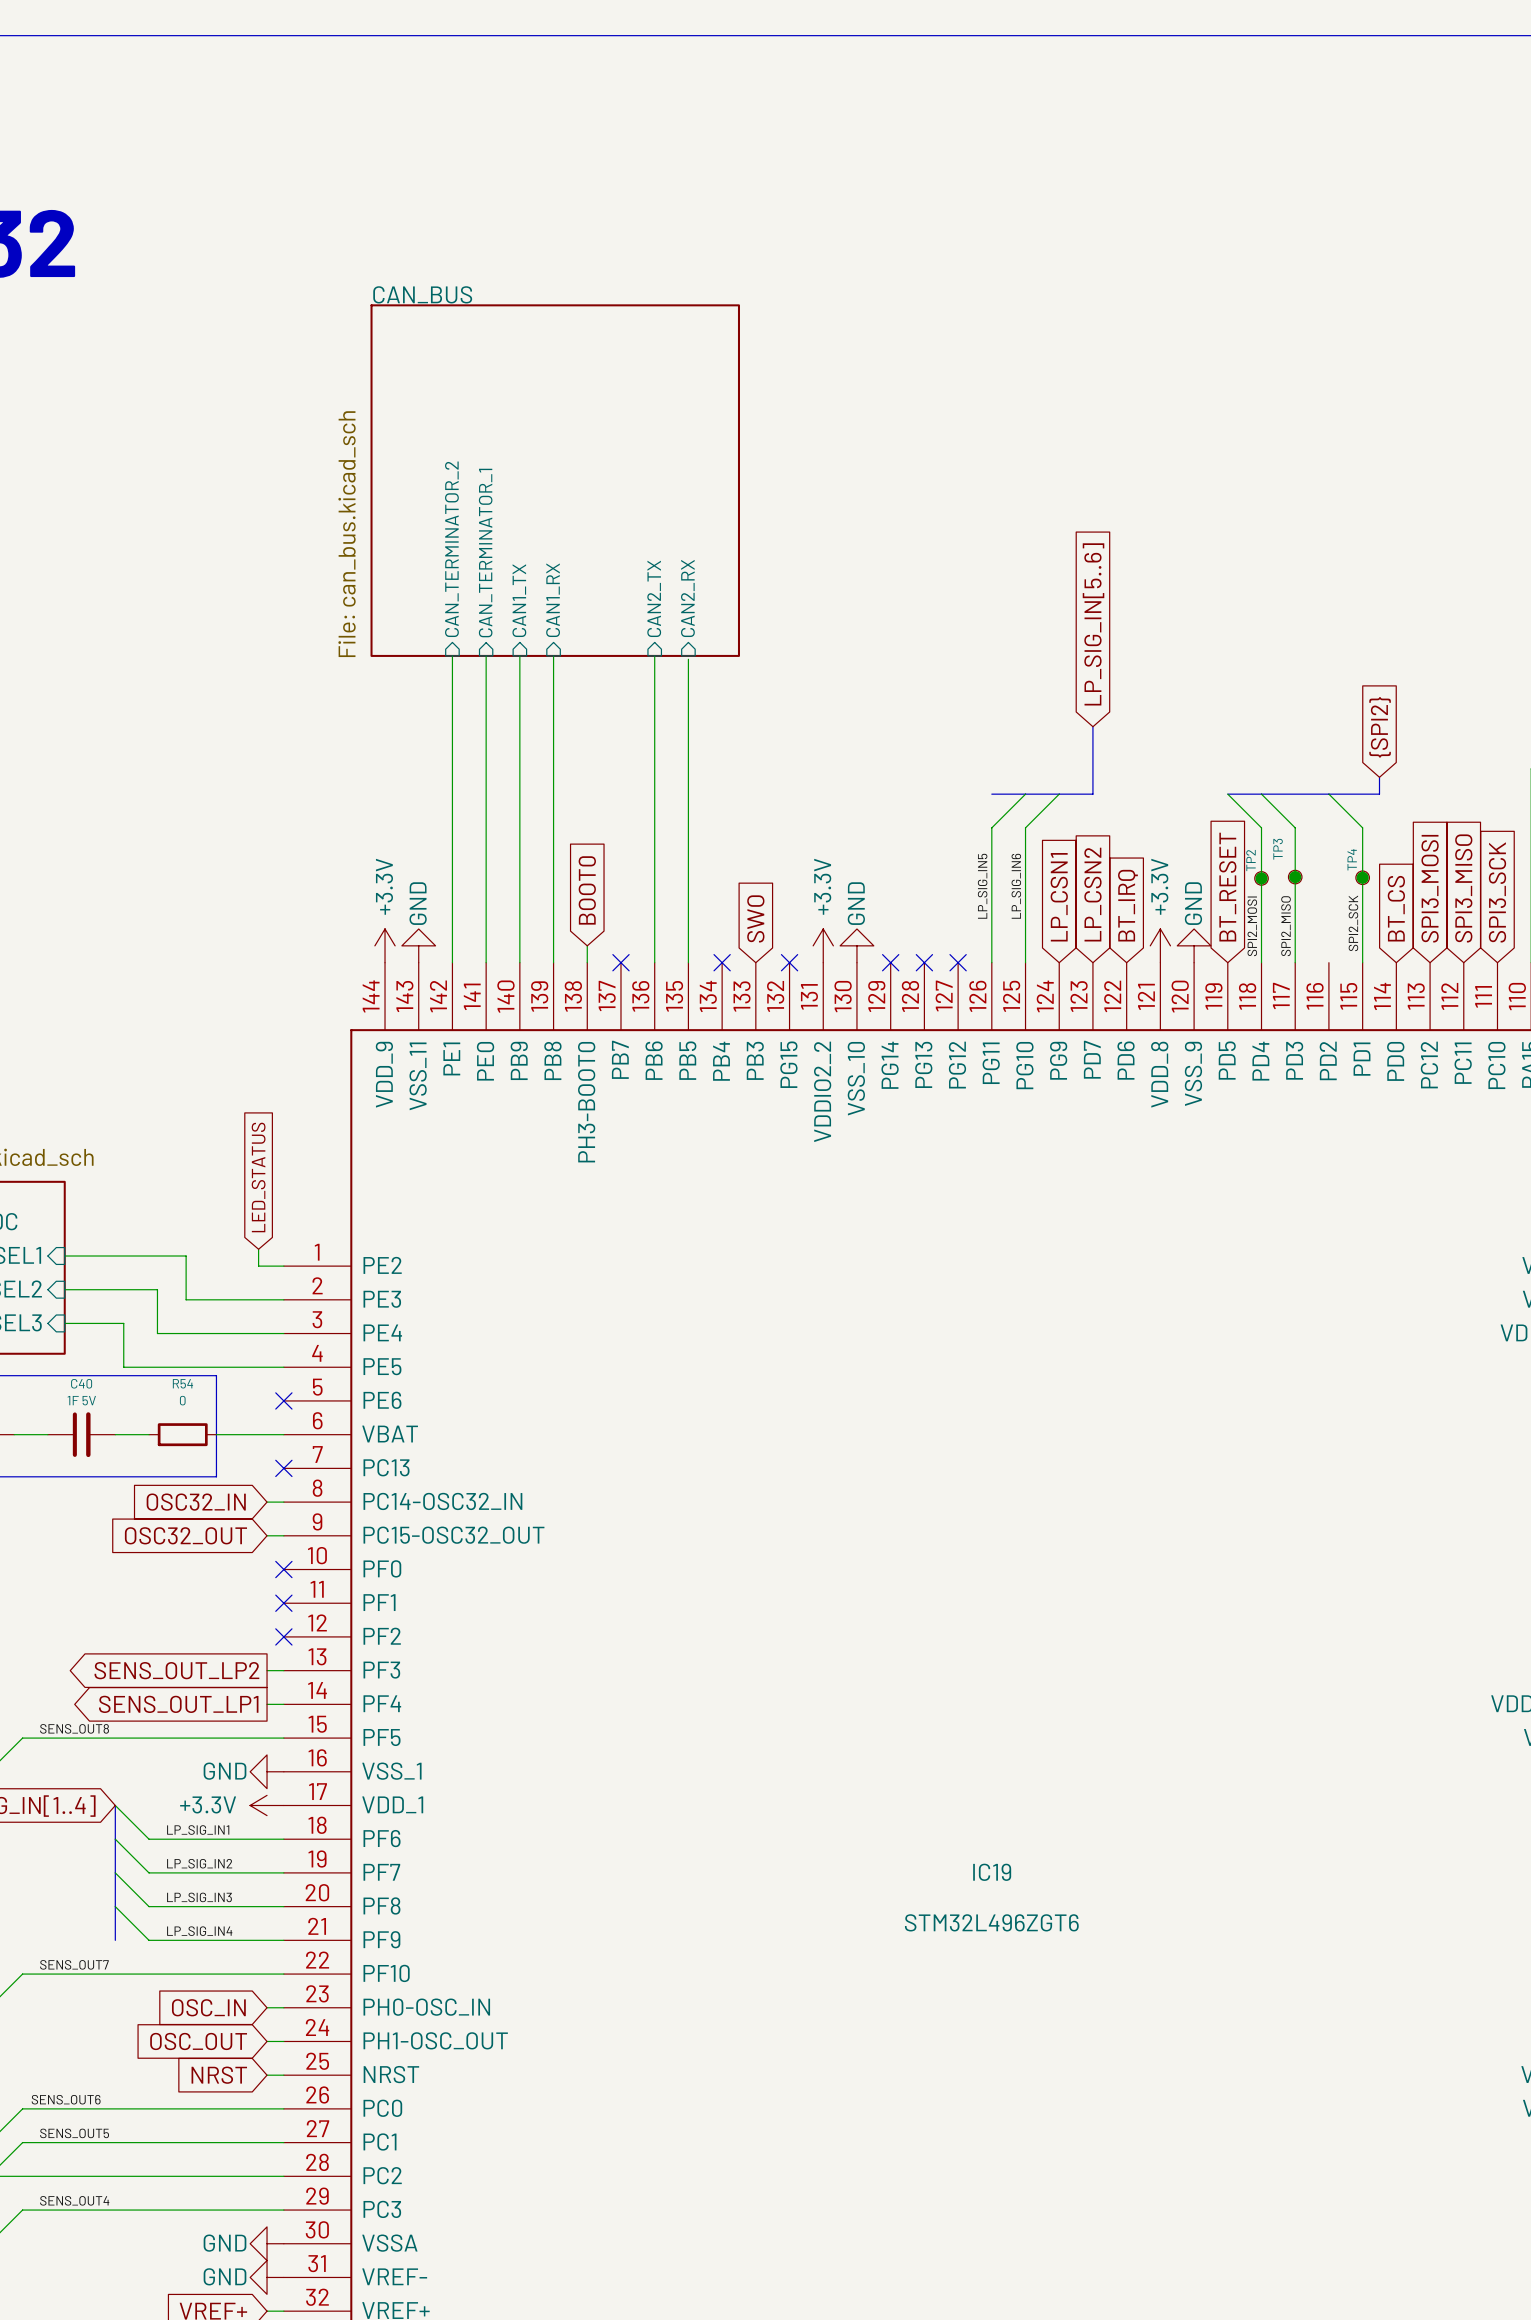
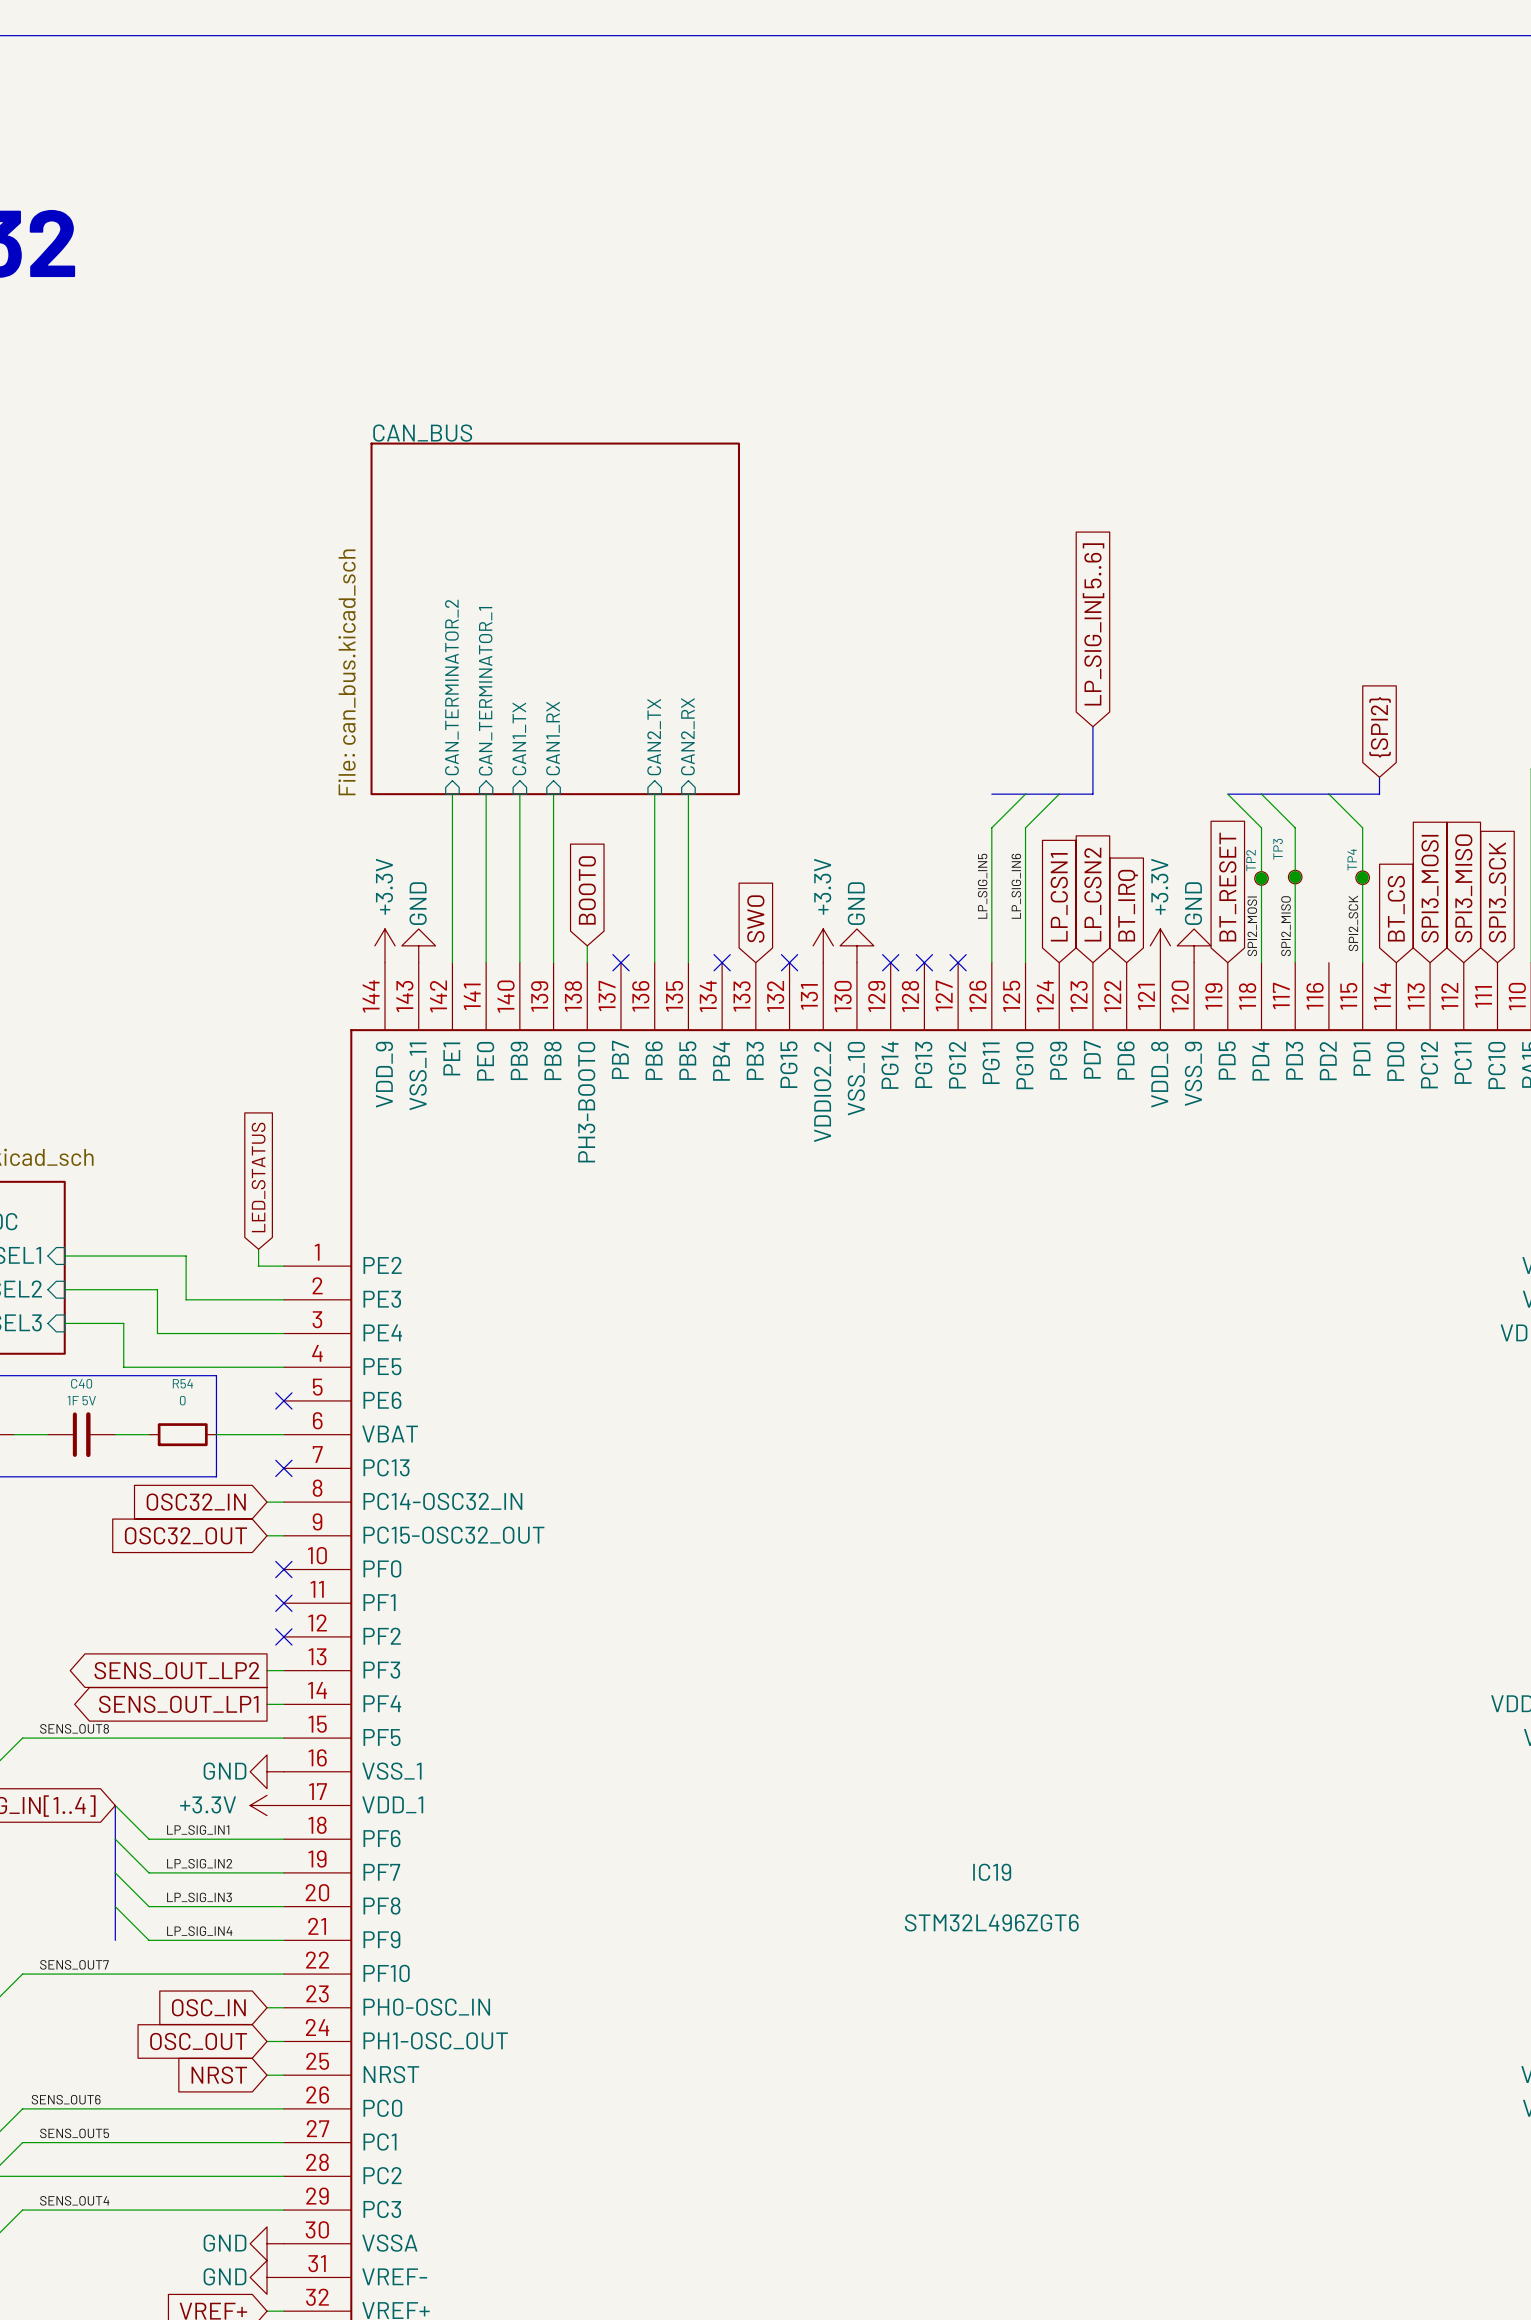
sheet CAN_BUS position: (555, 480) -> (555, 618)
sheet pin position: CAN_TERMINATOR_2 (451, 549) -> CAN_TERMINATOR_2 (451, 687)
sheet pin position: CAN_TERMINATOR_1 (485, 553) -> CAN_TERMINATOR_1 (485, 691)
sheet pin position: CAN2_TX (654, 598) -> CAN2_TX (654, 737)
sheet pin position: CAN2_RX (687, 598) -> CAN2_RX (687, 736)
sheet pin position: CAN1_TX (519, 600) -> CAN1_TX (519, 738)
sheet pin position: CAN1_RX (553, 600) -> CAN1_RX (553, 738)
wire: (452, 655) (452, 794) -> none
wire: (486, 655) (486, 794) -> none
wire: (519, 655) (519, 794) -> none
wire: (553, 655) (553, 794) -> none
wire: (654, 655) (654, 794) -> none
wire: (688, 659) (688, 794) -> none

